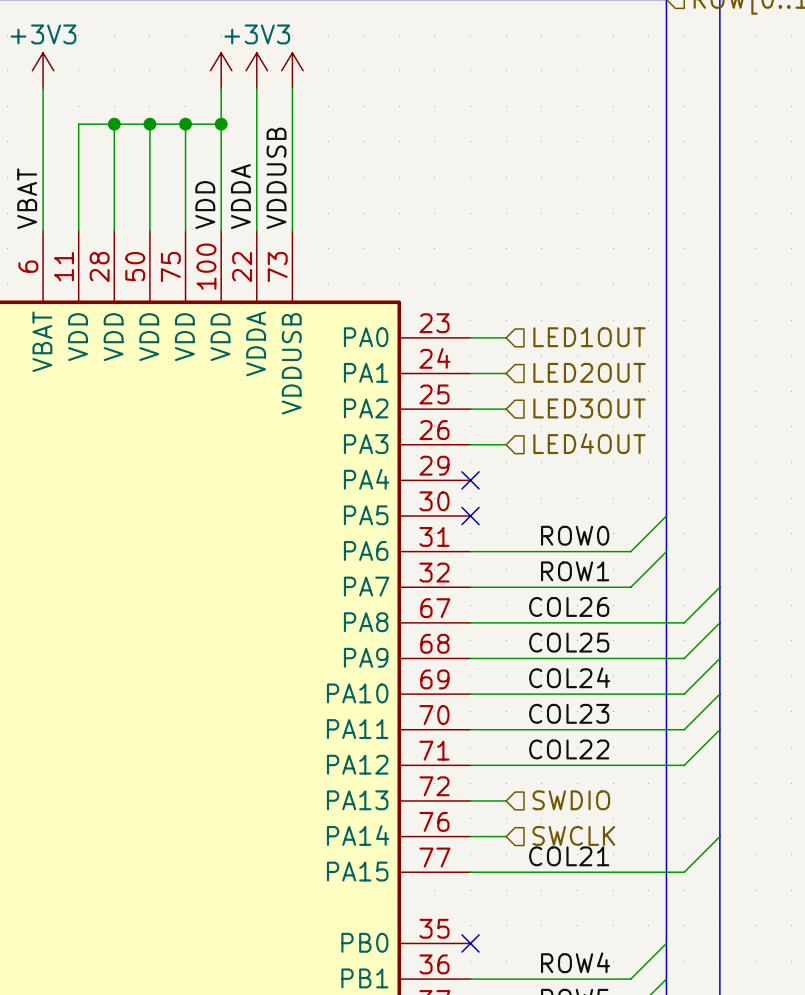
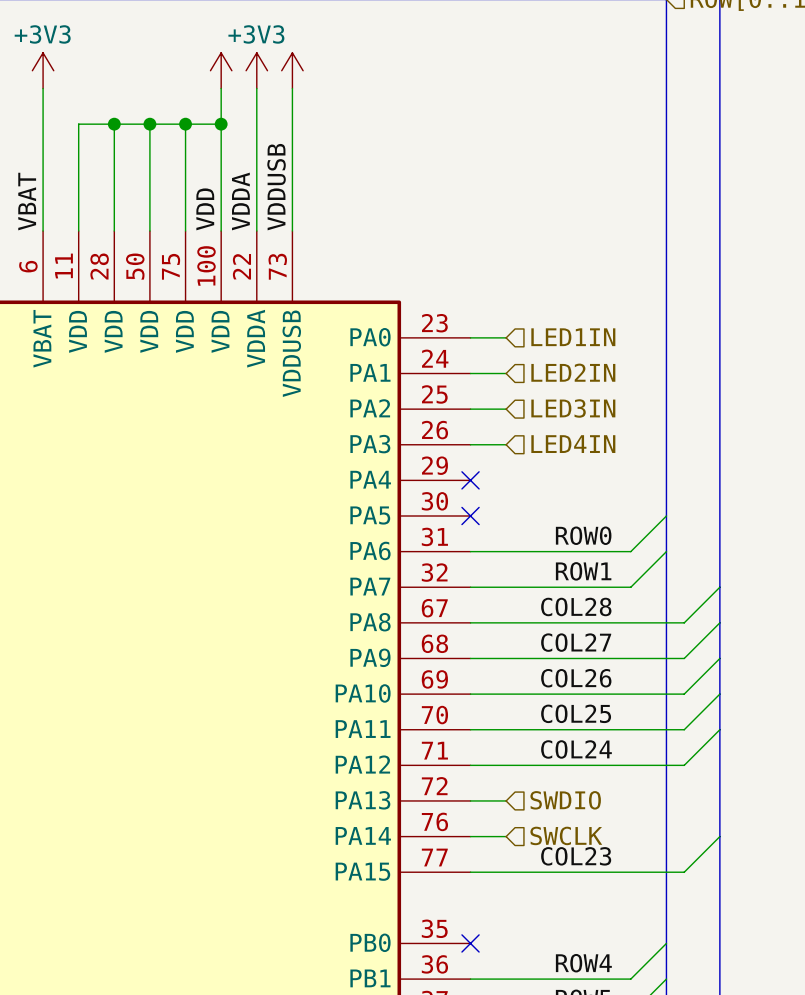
hierarchical label: LED1OUT (589, 337) -> LED1IN (573, 337)
hierarchical label: LED2OUT (589, 372) -> LED2IN (573, 372)
hierarchical label: LED3OUT (589, 408) -> LED3IN (573, 408)
hierarchical label: LED4OUT (589, 443) -> LED4IN (573, 444)
label: COL26 (569, 606) -> COL28 (576, 606)
label: COL25 (569, 642) -> COL27 (576, 642)
label: COL24 (569, 677) -> COL26 (576, 678)
label: COL23 (569, 713) -> COL25 (576, 713)
label: COL22 (569, 749) -> COL24 (576, 749)
label: COL21 (569, 856) -> COL23 (576, 856)

